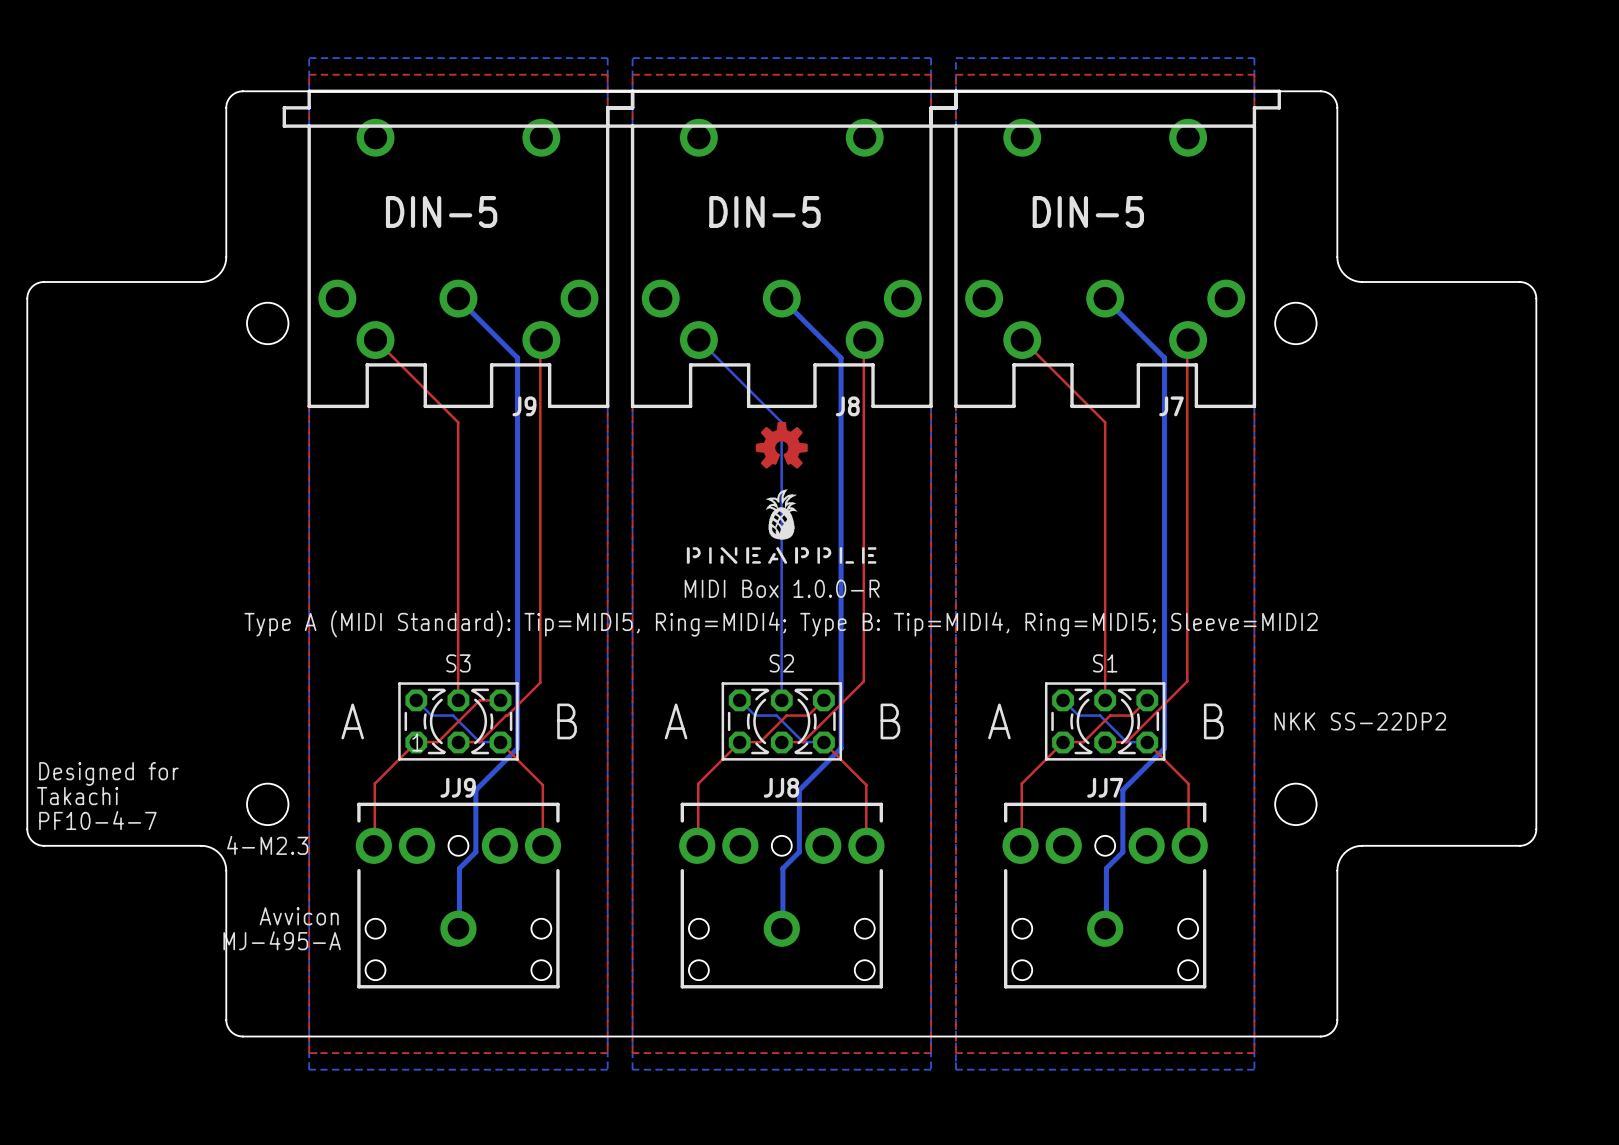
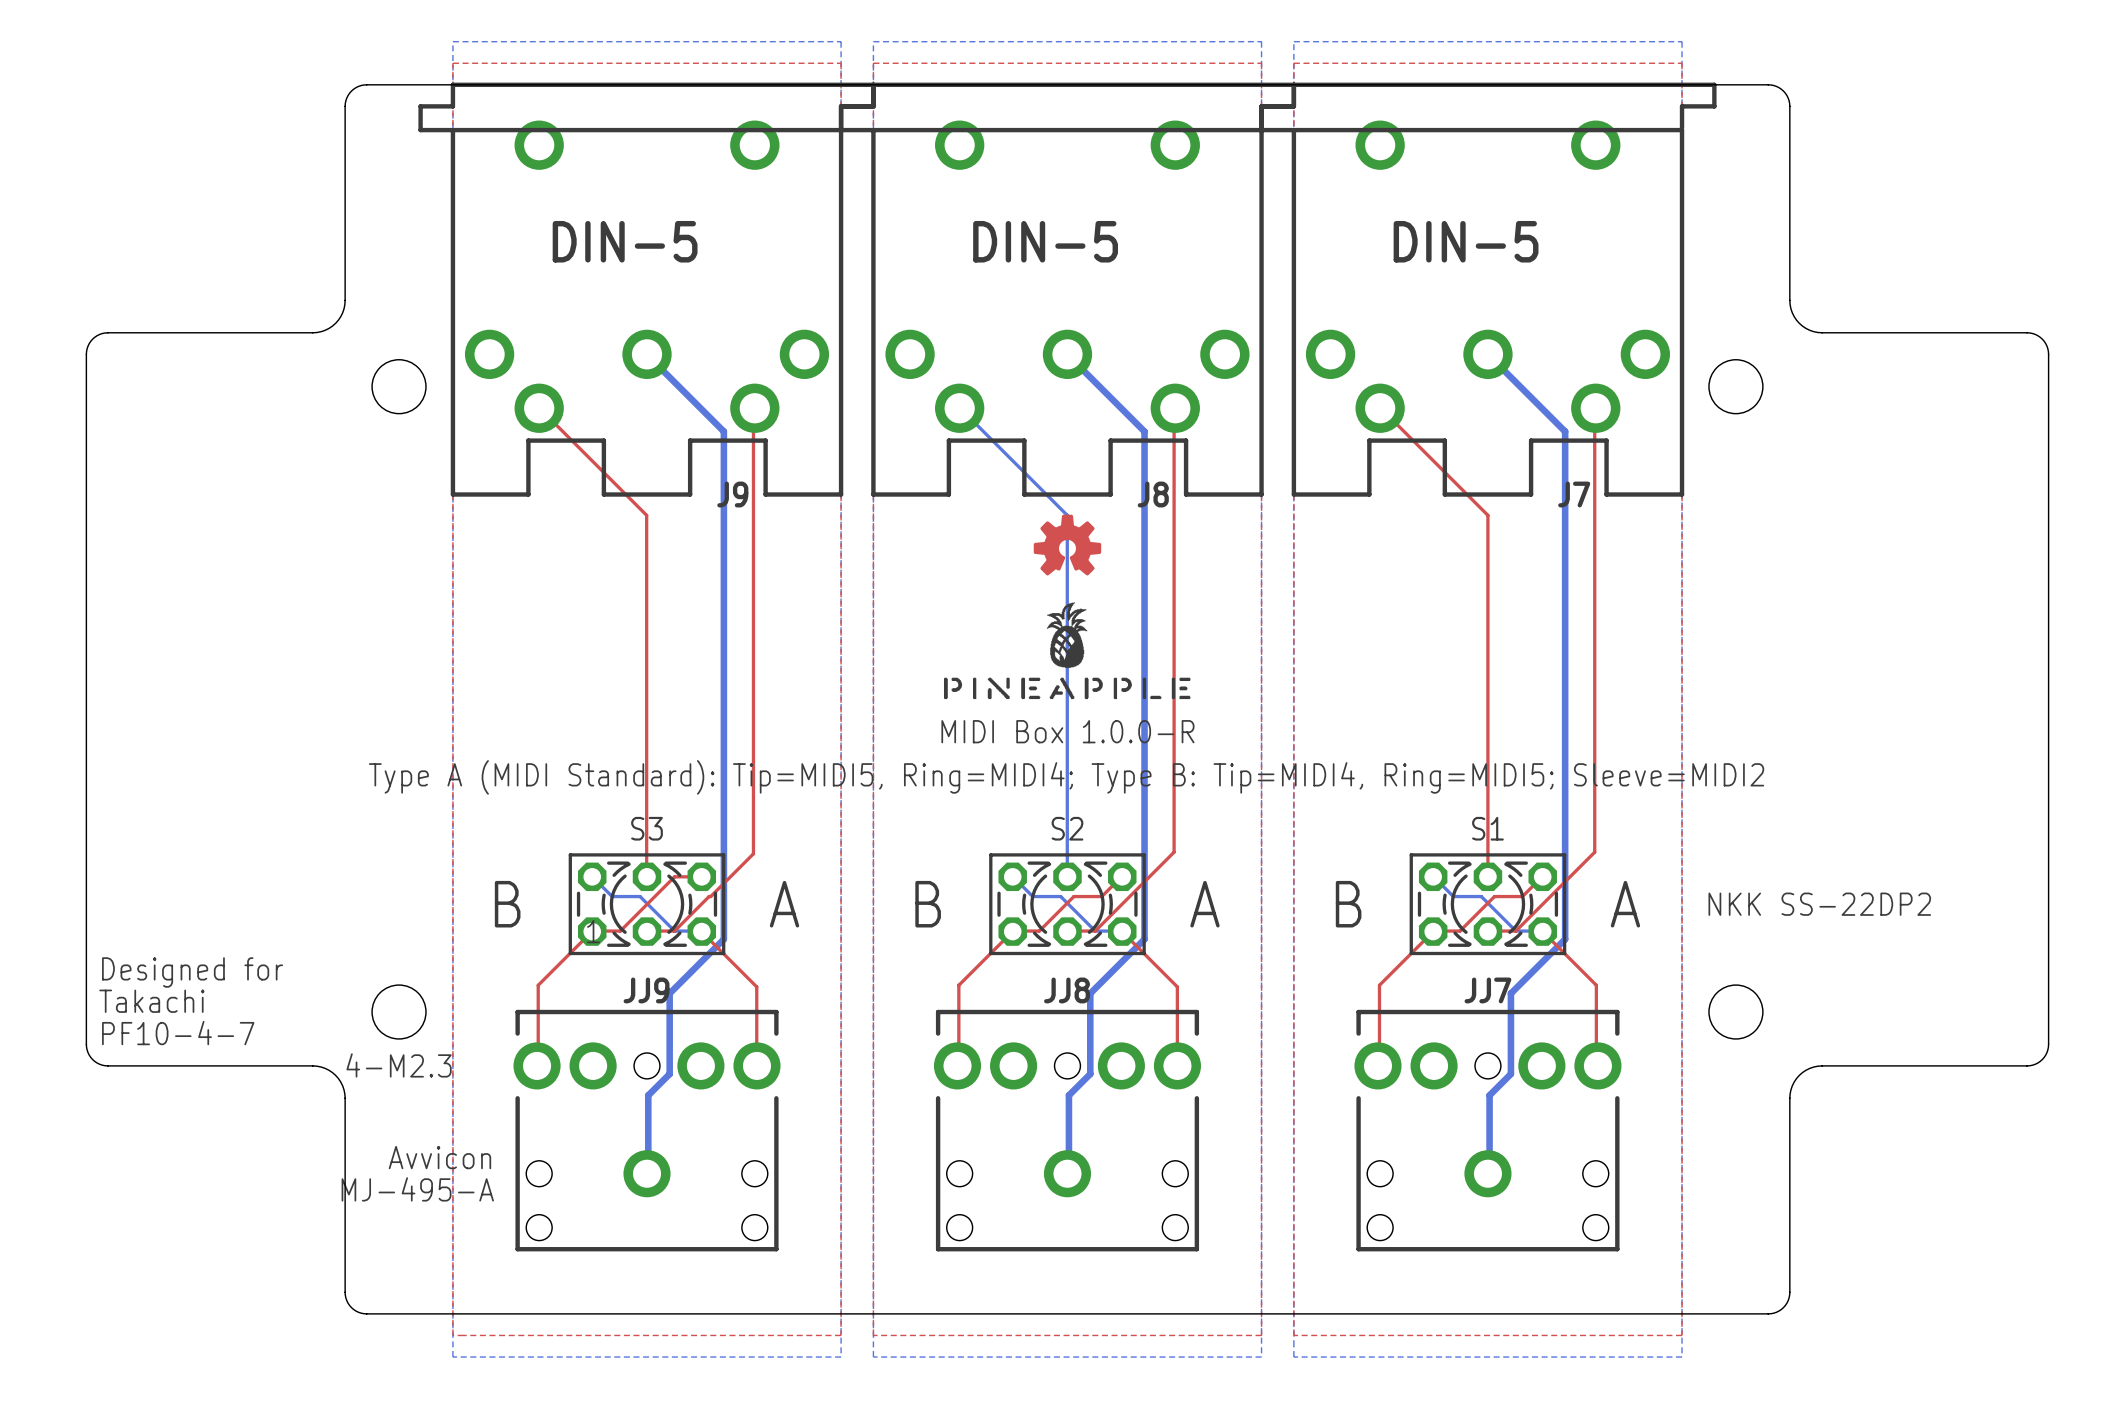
text: A (352, 721) -> B (507, 904)
text: B (567, 721) -> A (784, 904)
text: A (676, 721) -> B (928, 904)
text: B (890, 721) -> A (1204, 904)
text: A (999, 721) -> B (1348, 904)
text: B (1213, 721) -> A (1625, 904)

